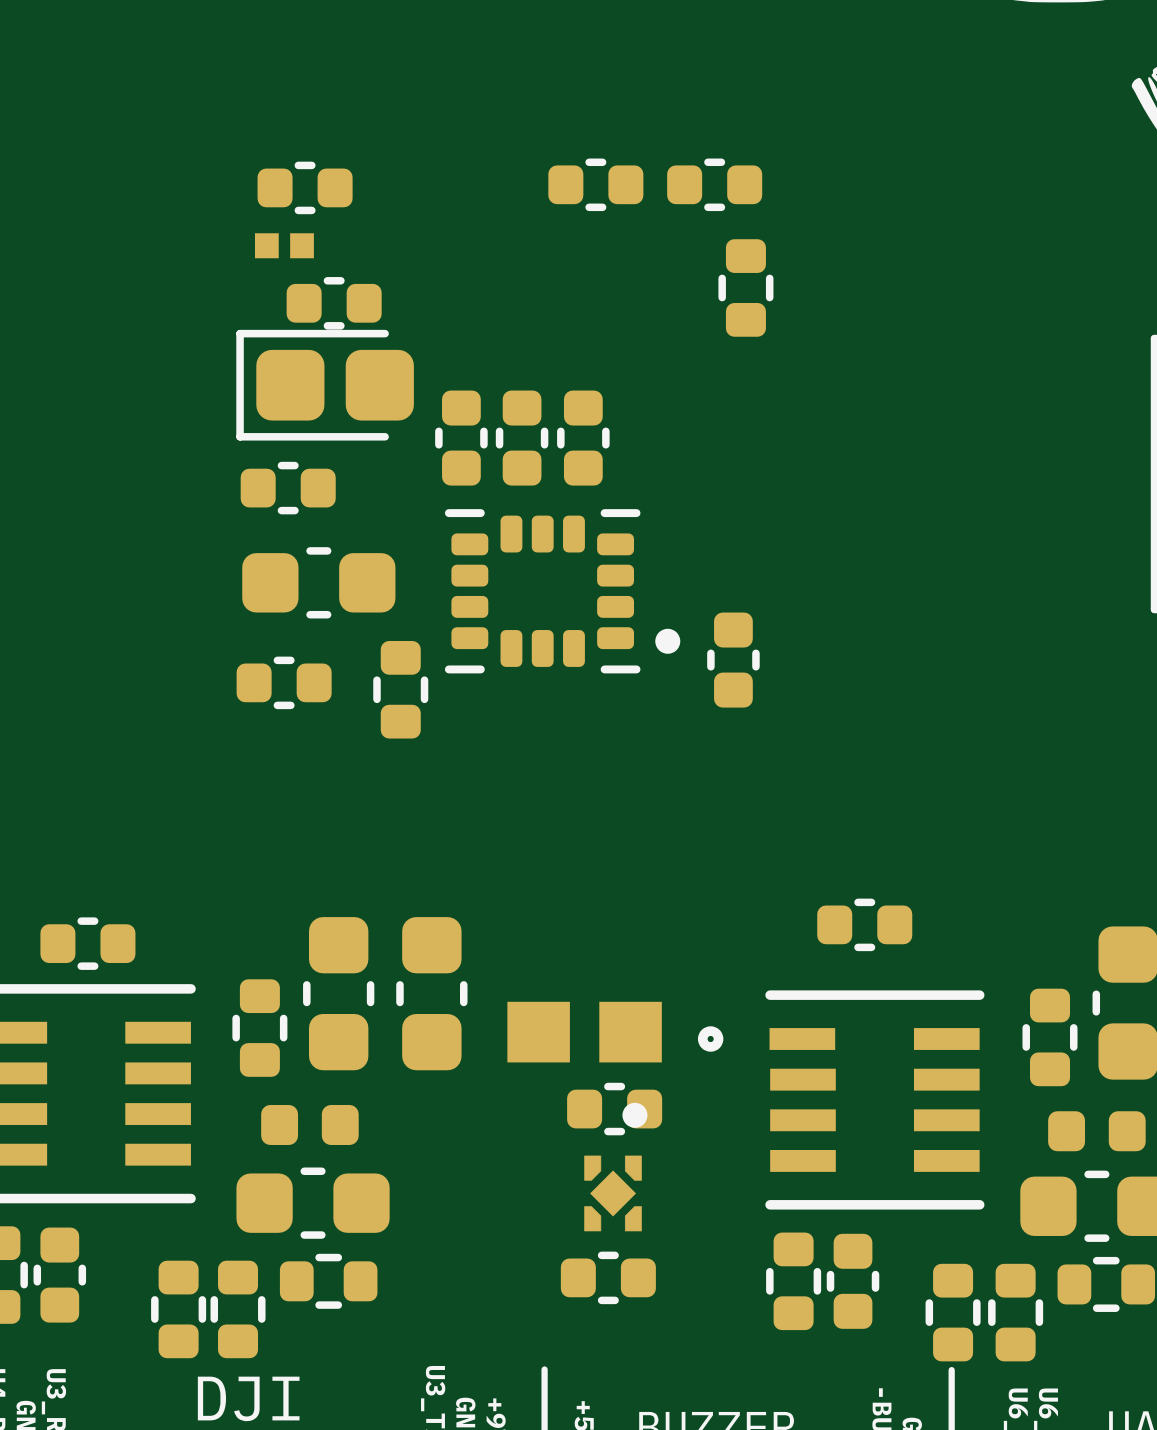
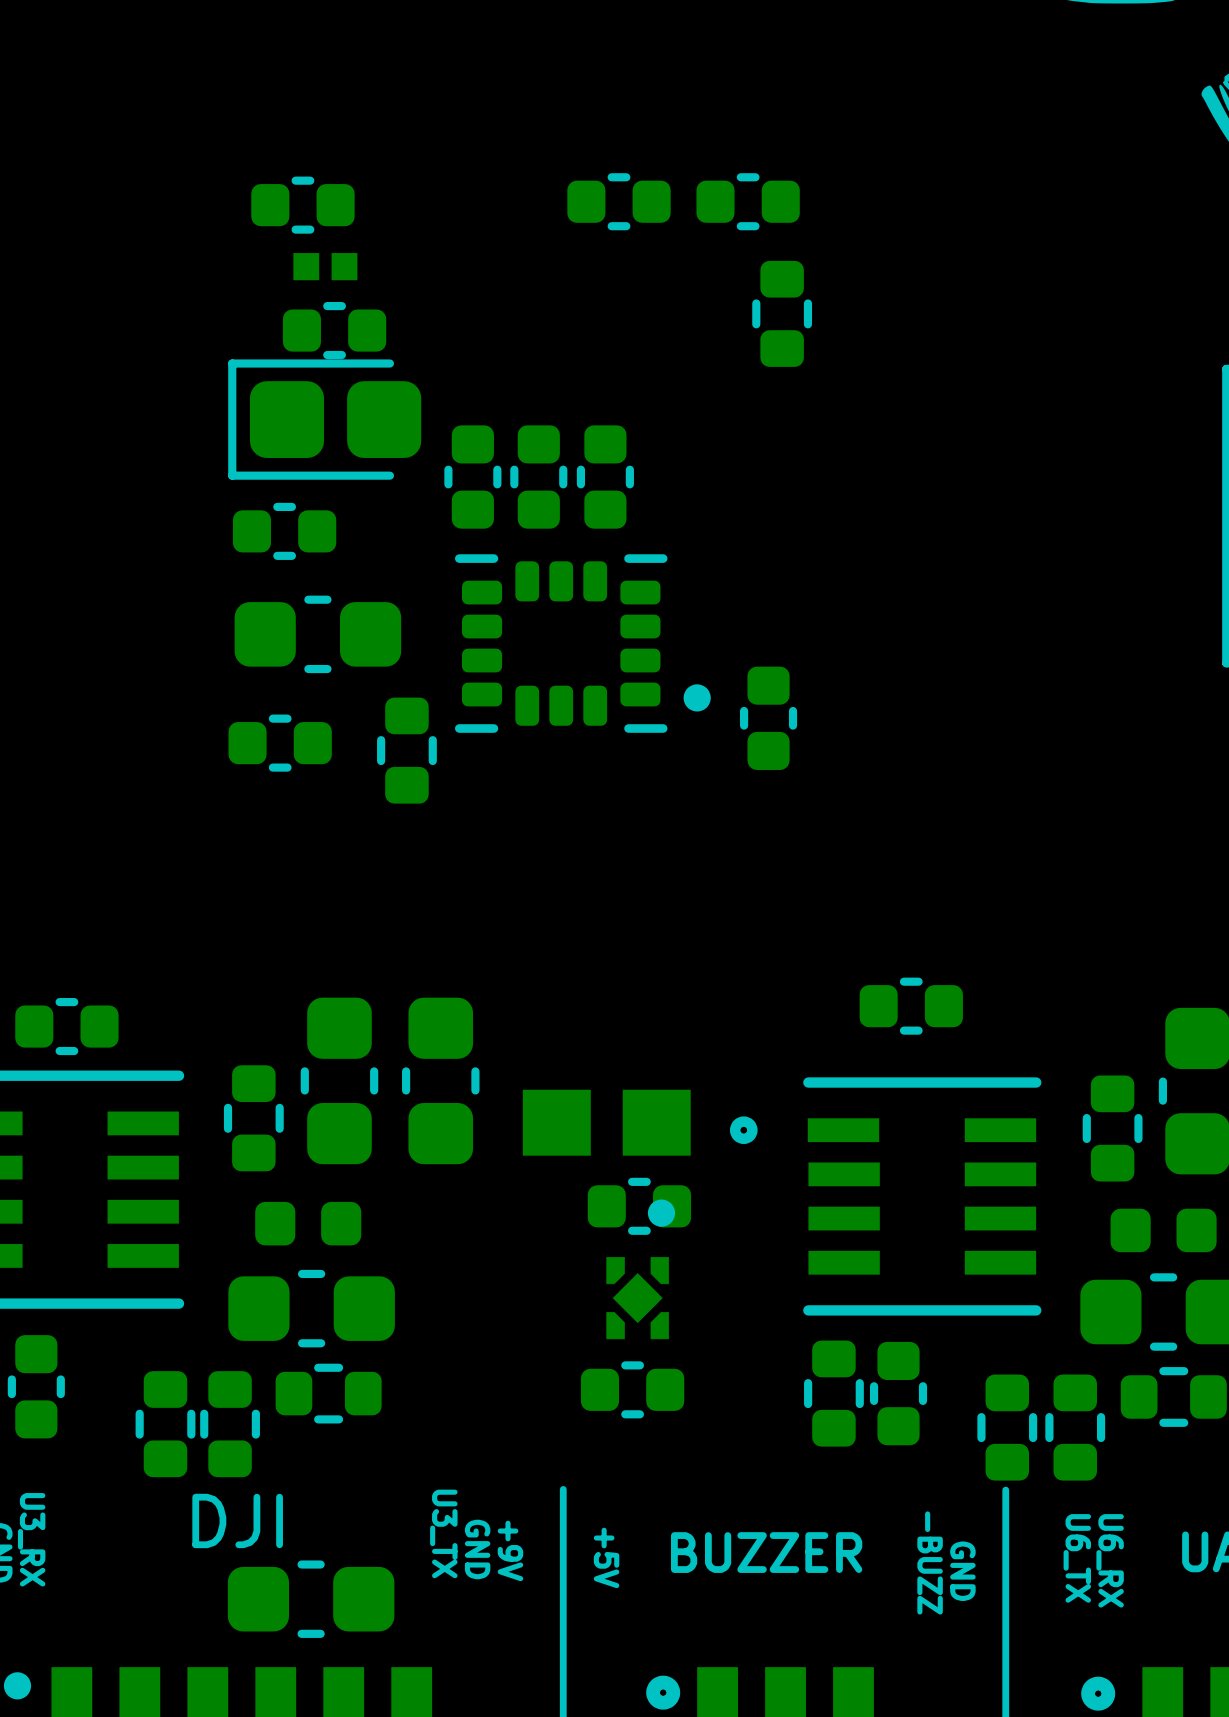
part position: (284, 245) -> (325, 266)

